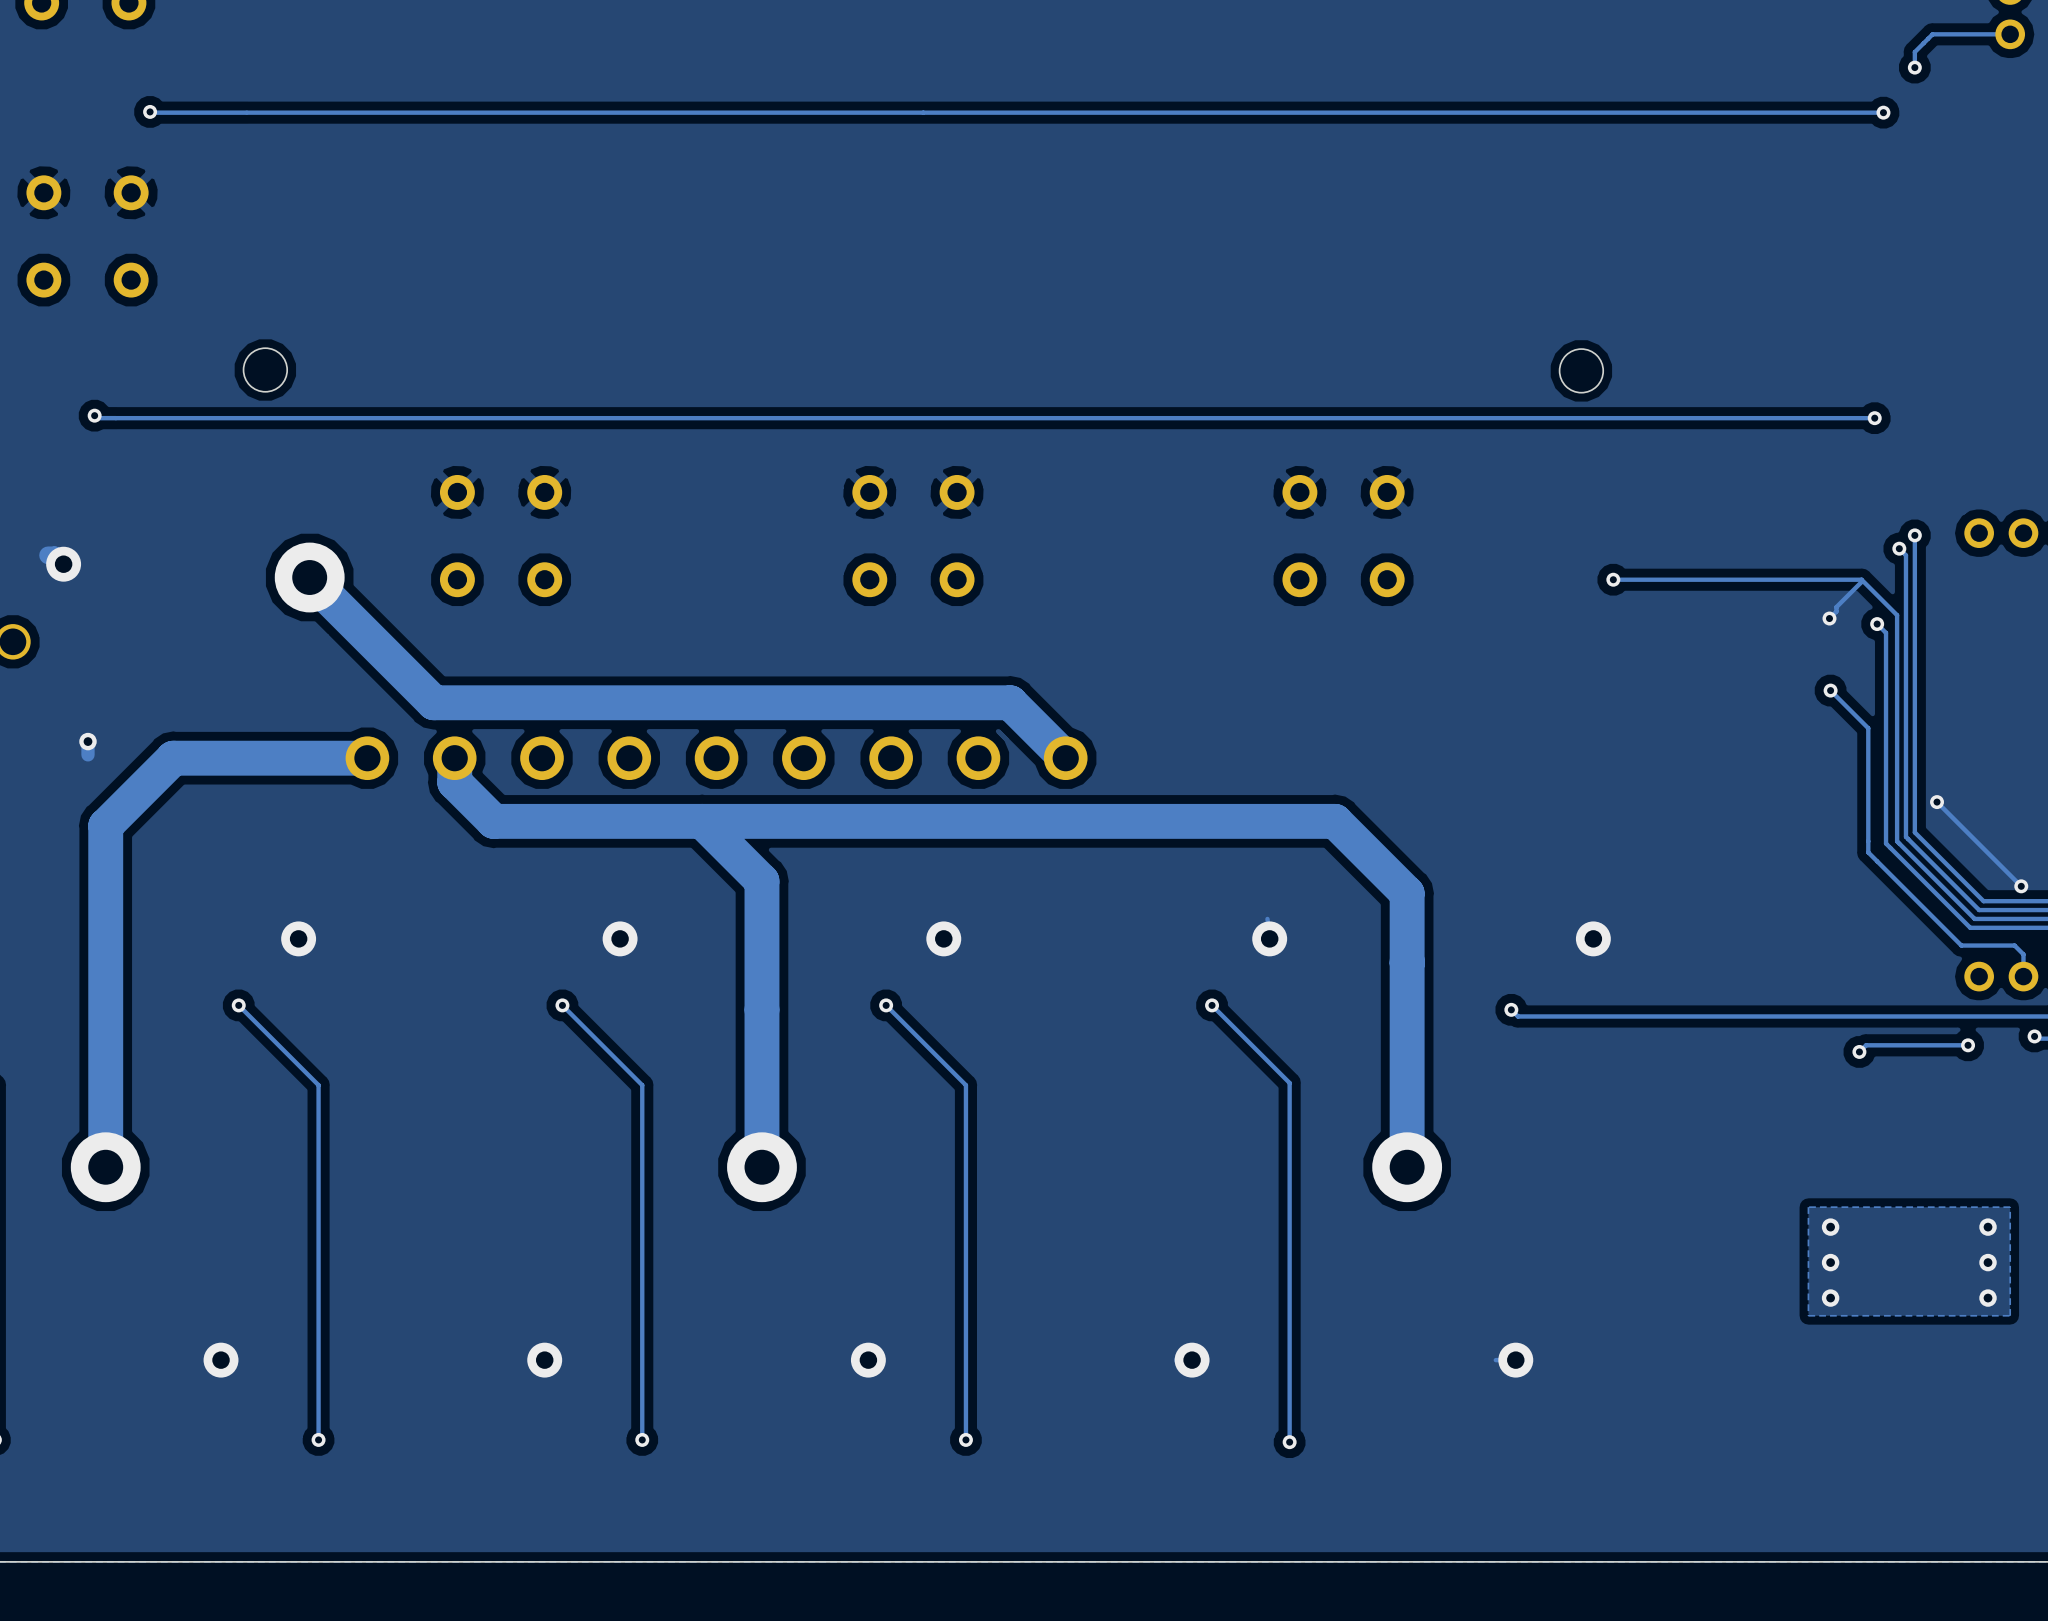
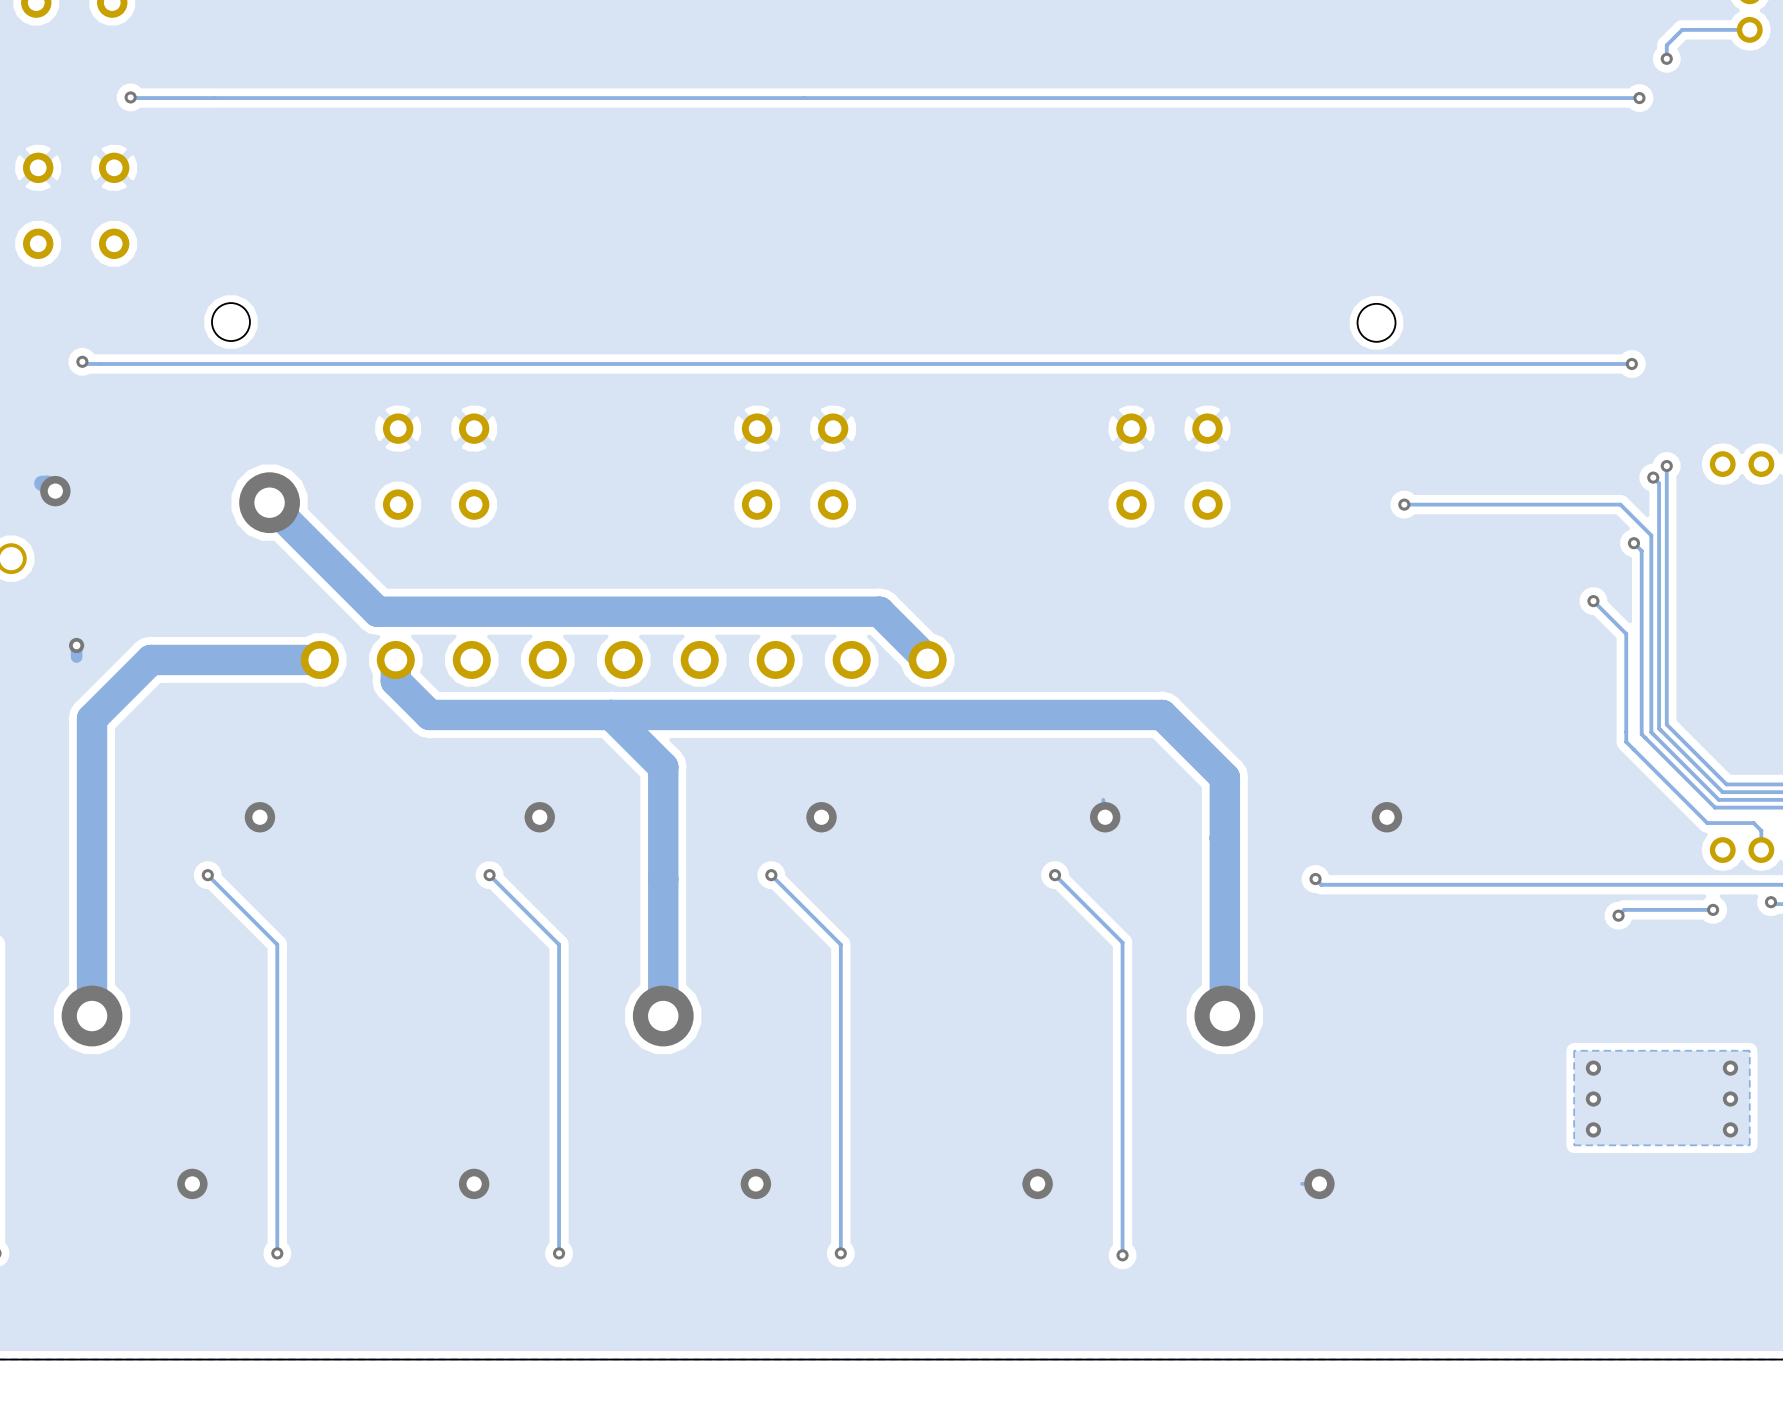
track: (1861, 579) (1861, 581) (1836, 607) (1836, 611) (1829, 618) -> none
via: (1829, 618) -> none
track: (1937, 802) (2021, 886) -> none
via: (1937, 802) -> none
via: (2021, 886) -> none

